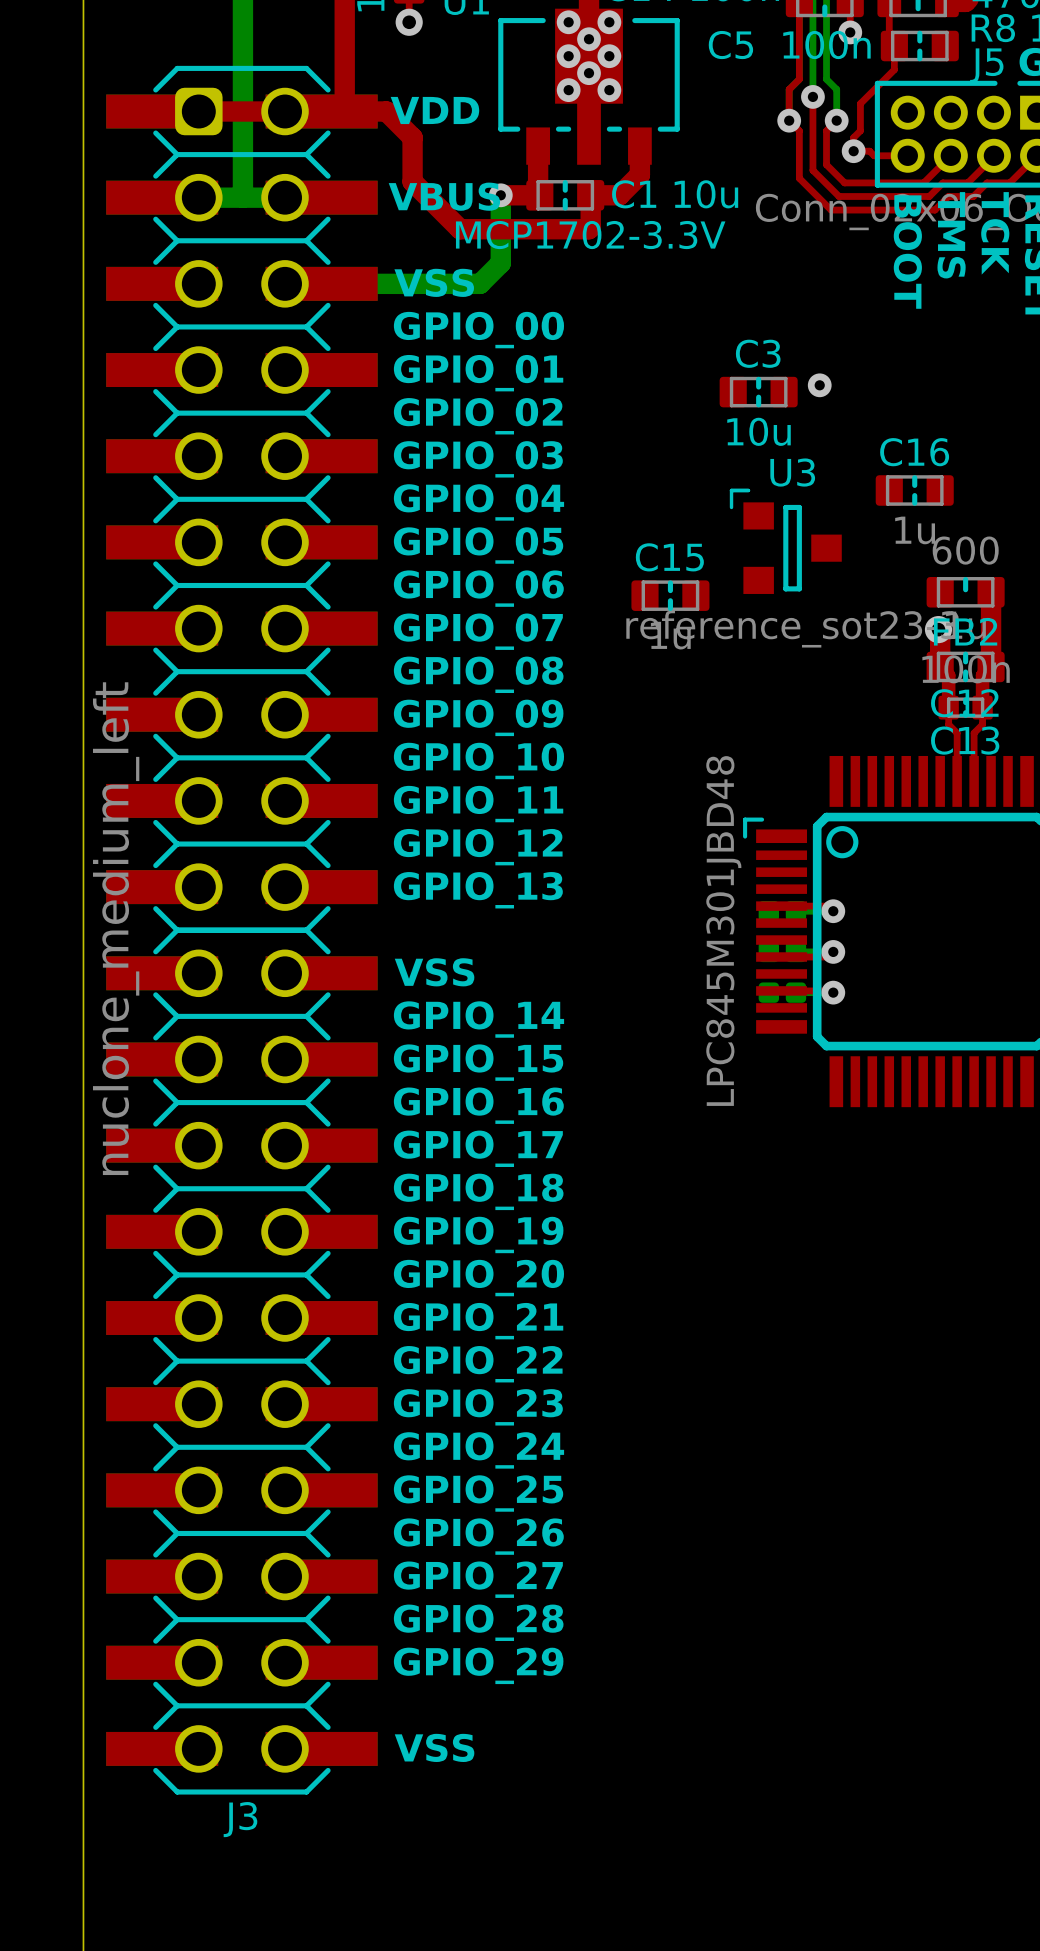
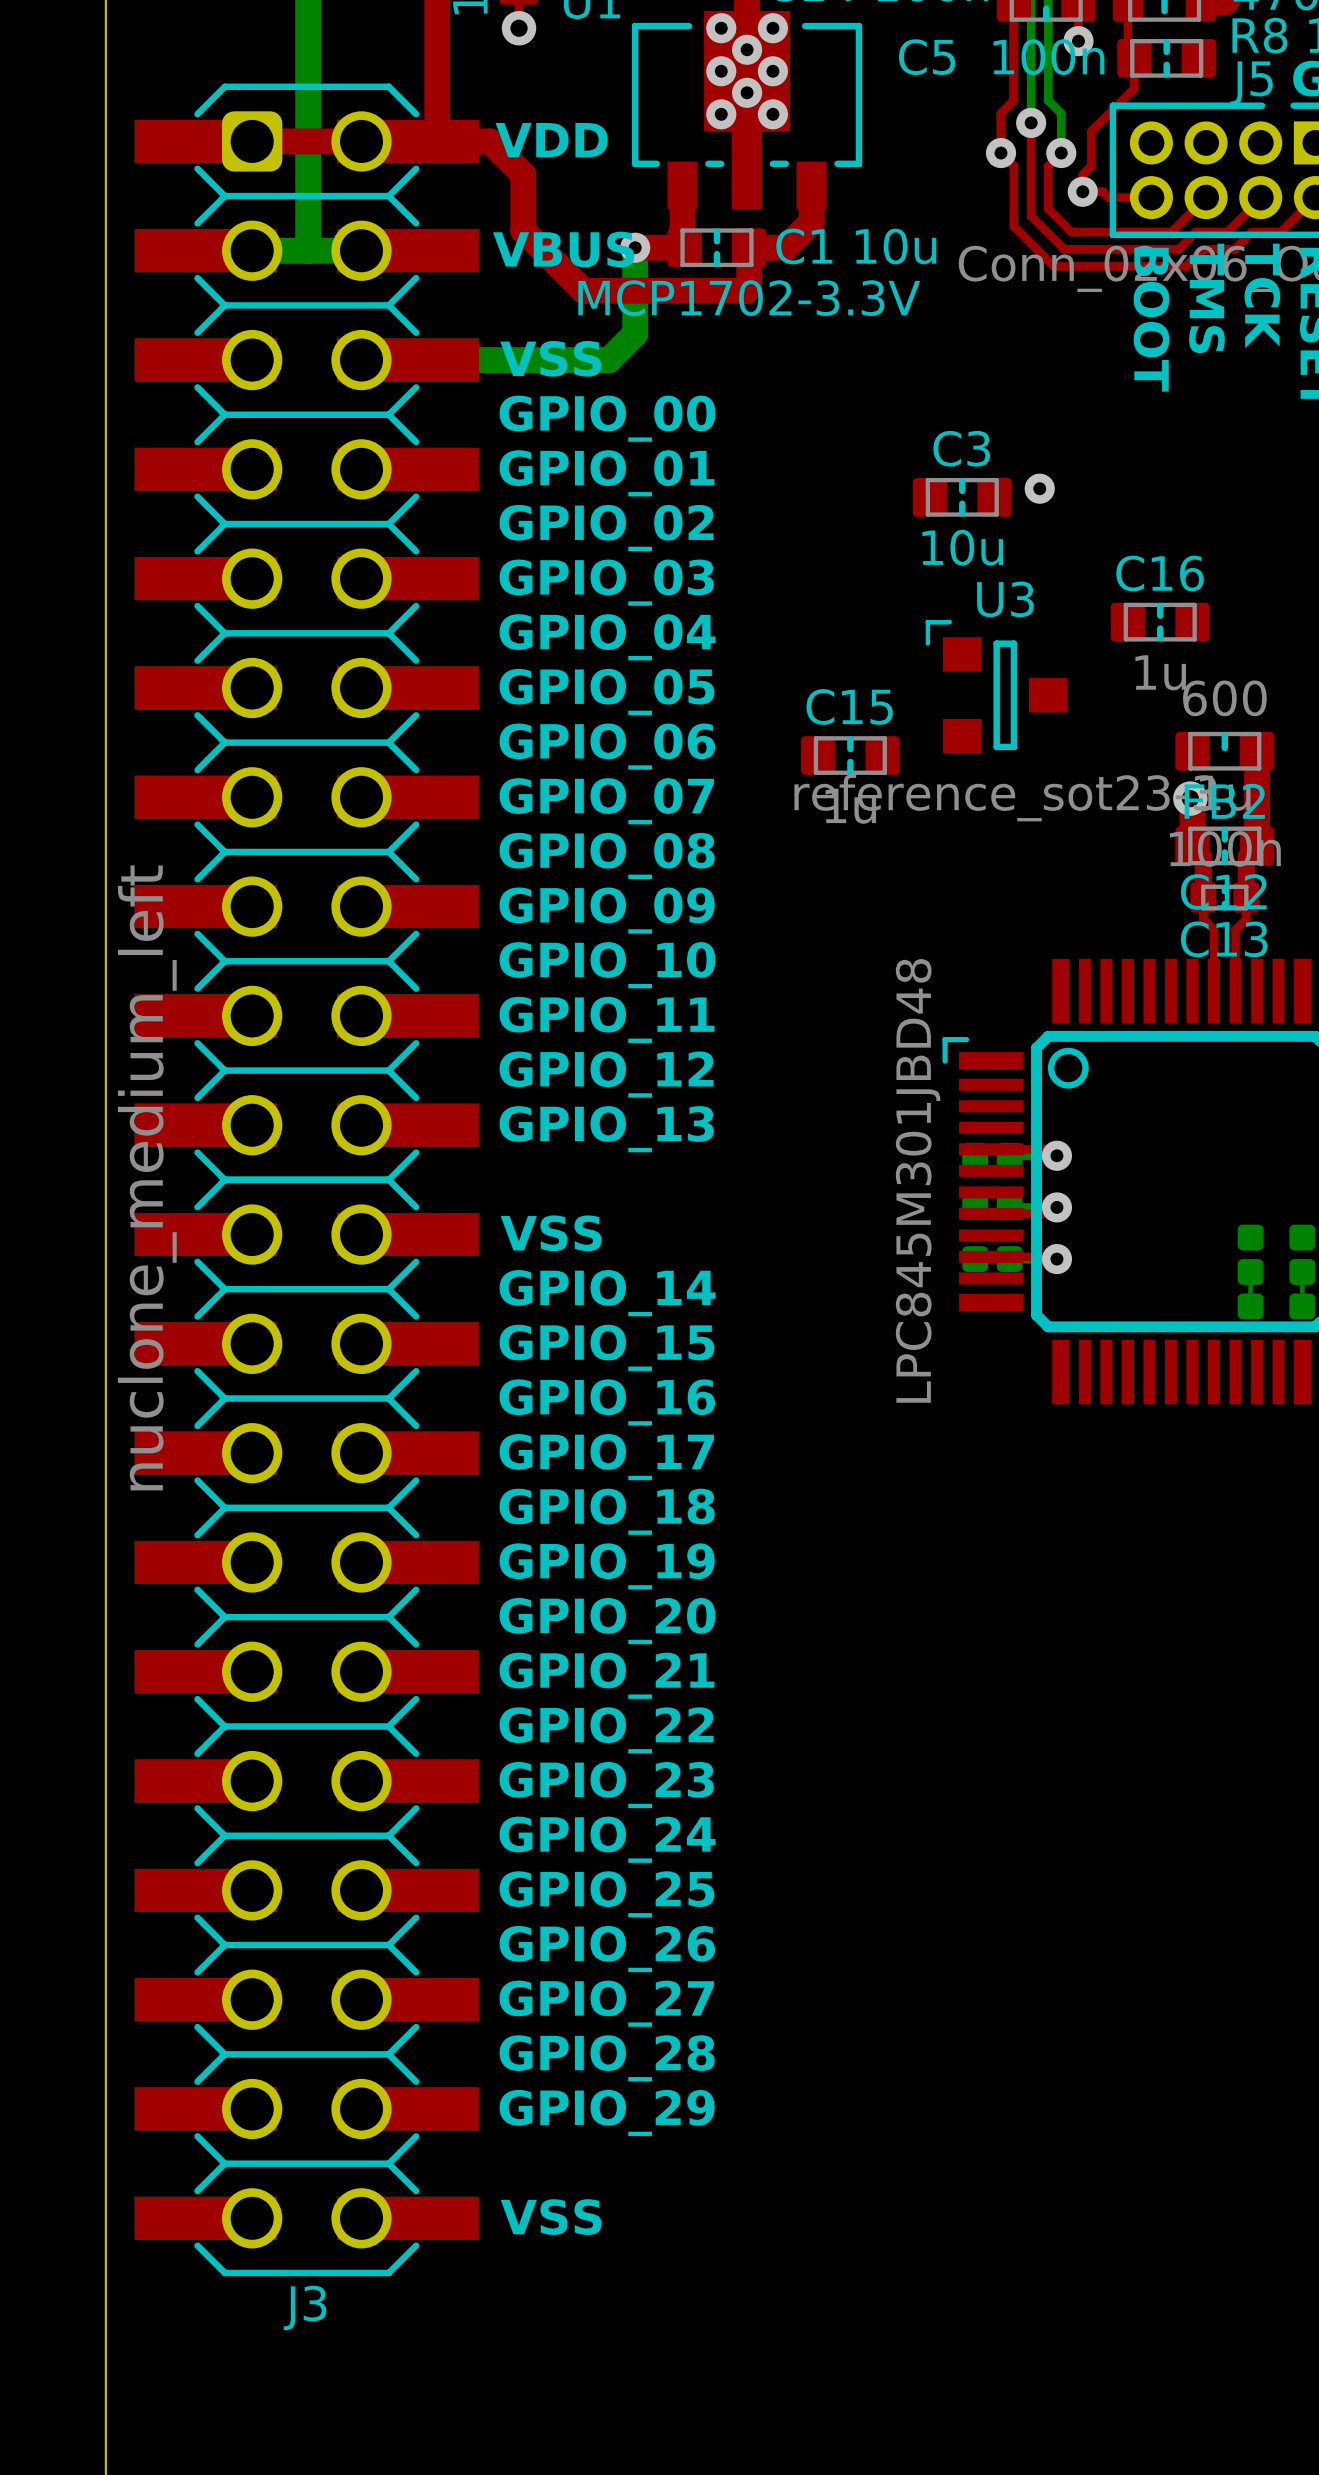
part: none -> (1250, 1271)
part: none -> (1302, 1271)

